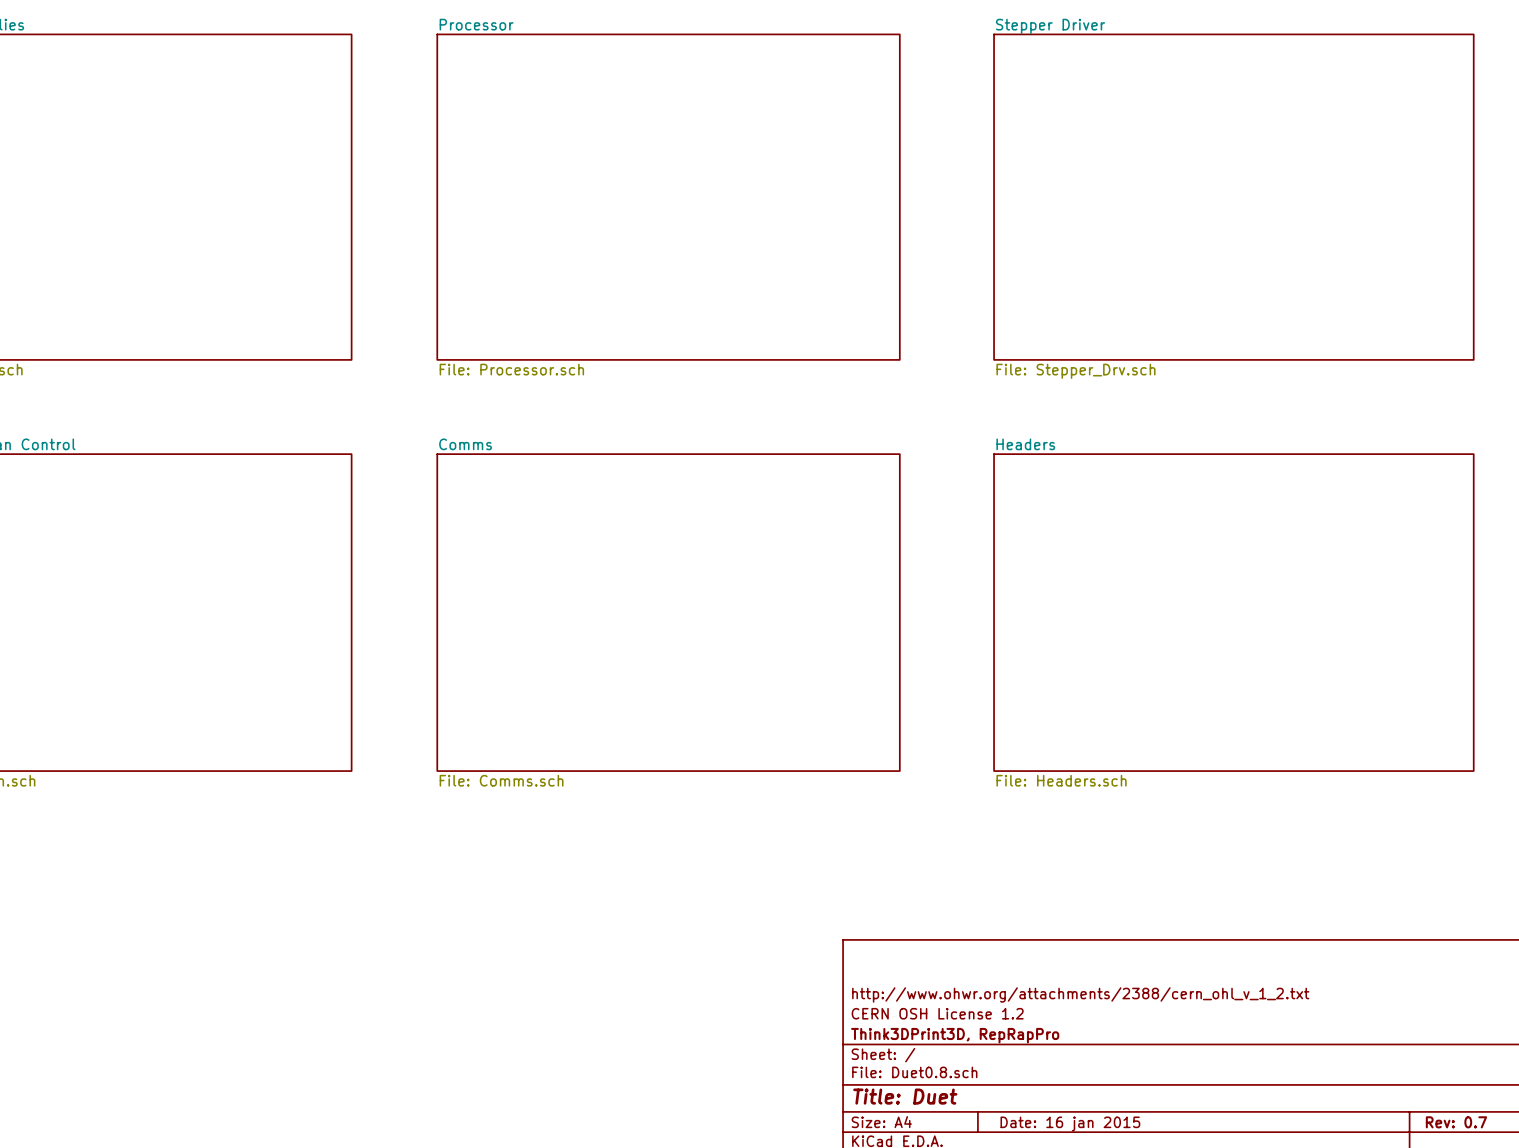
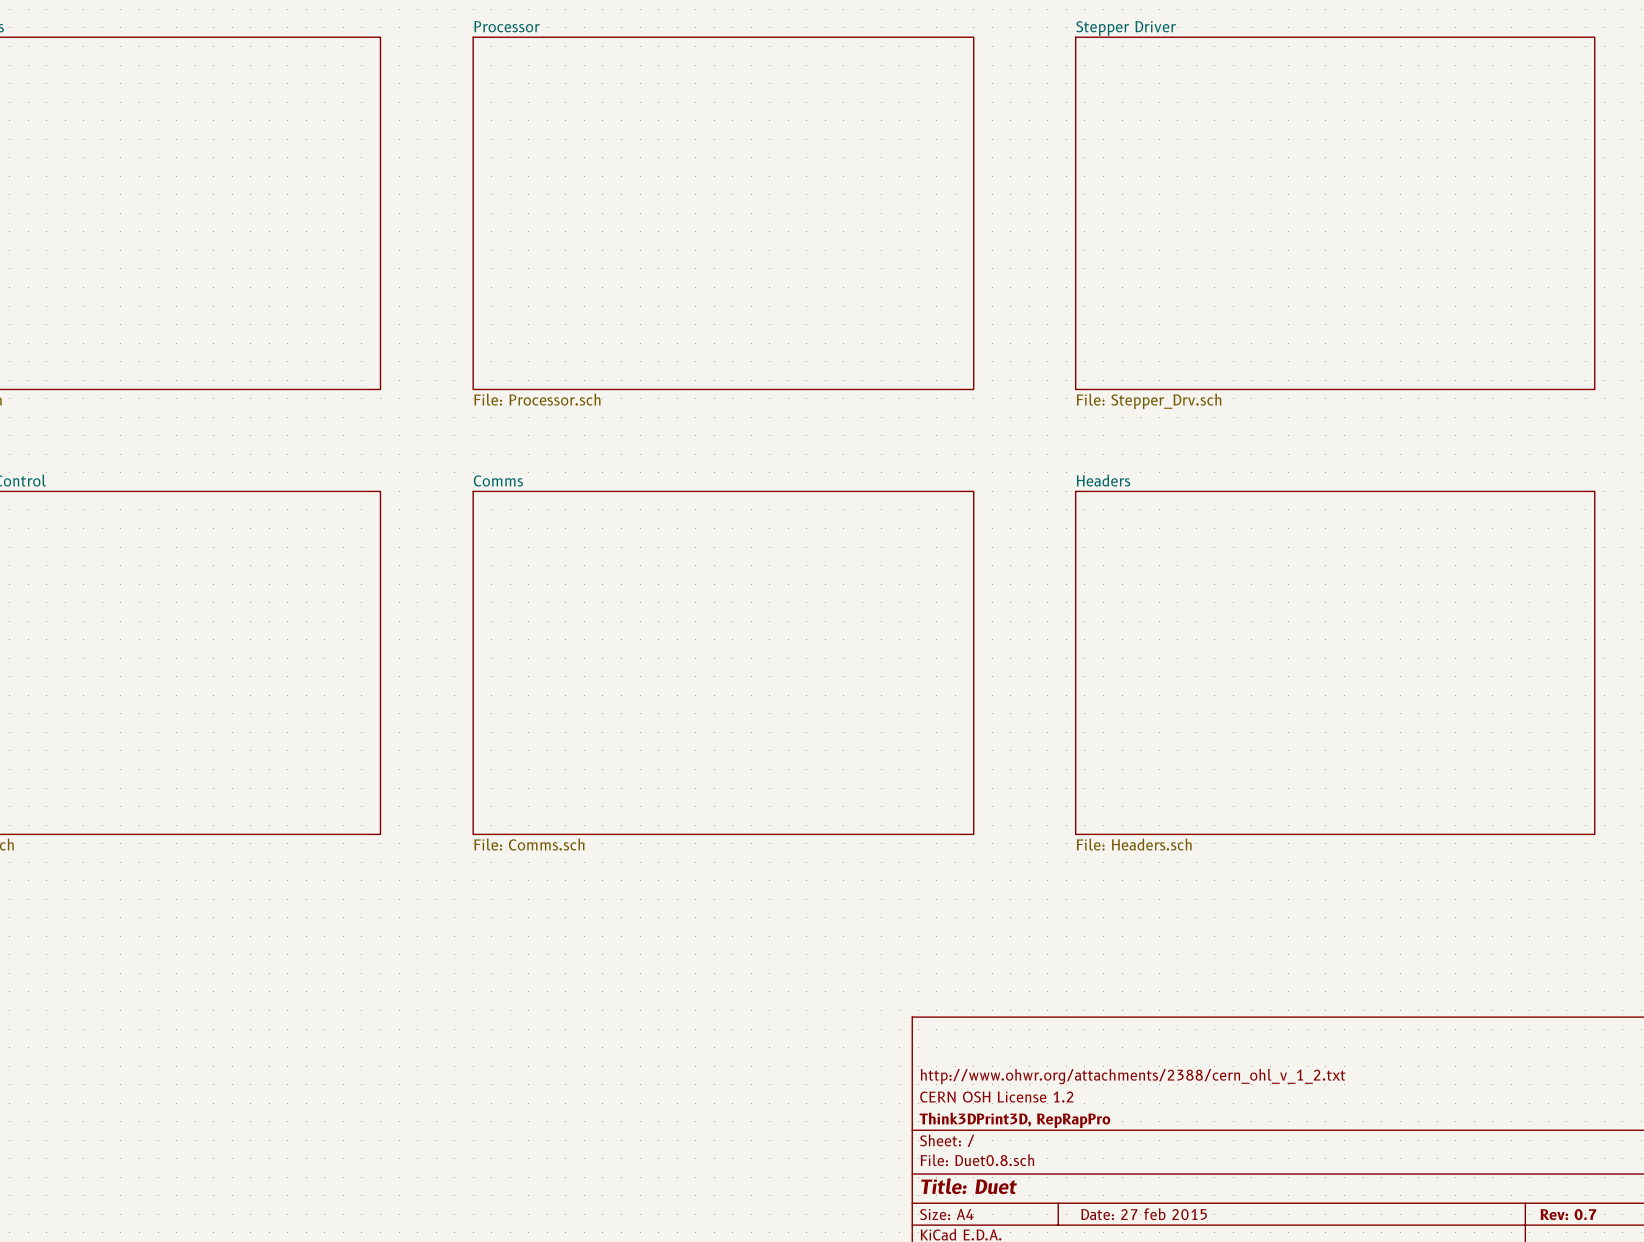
title block: Date: 16 jan 2015 (1070, 1124) -> Date: 27 feb 2015 (1144, 1214)

